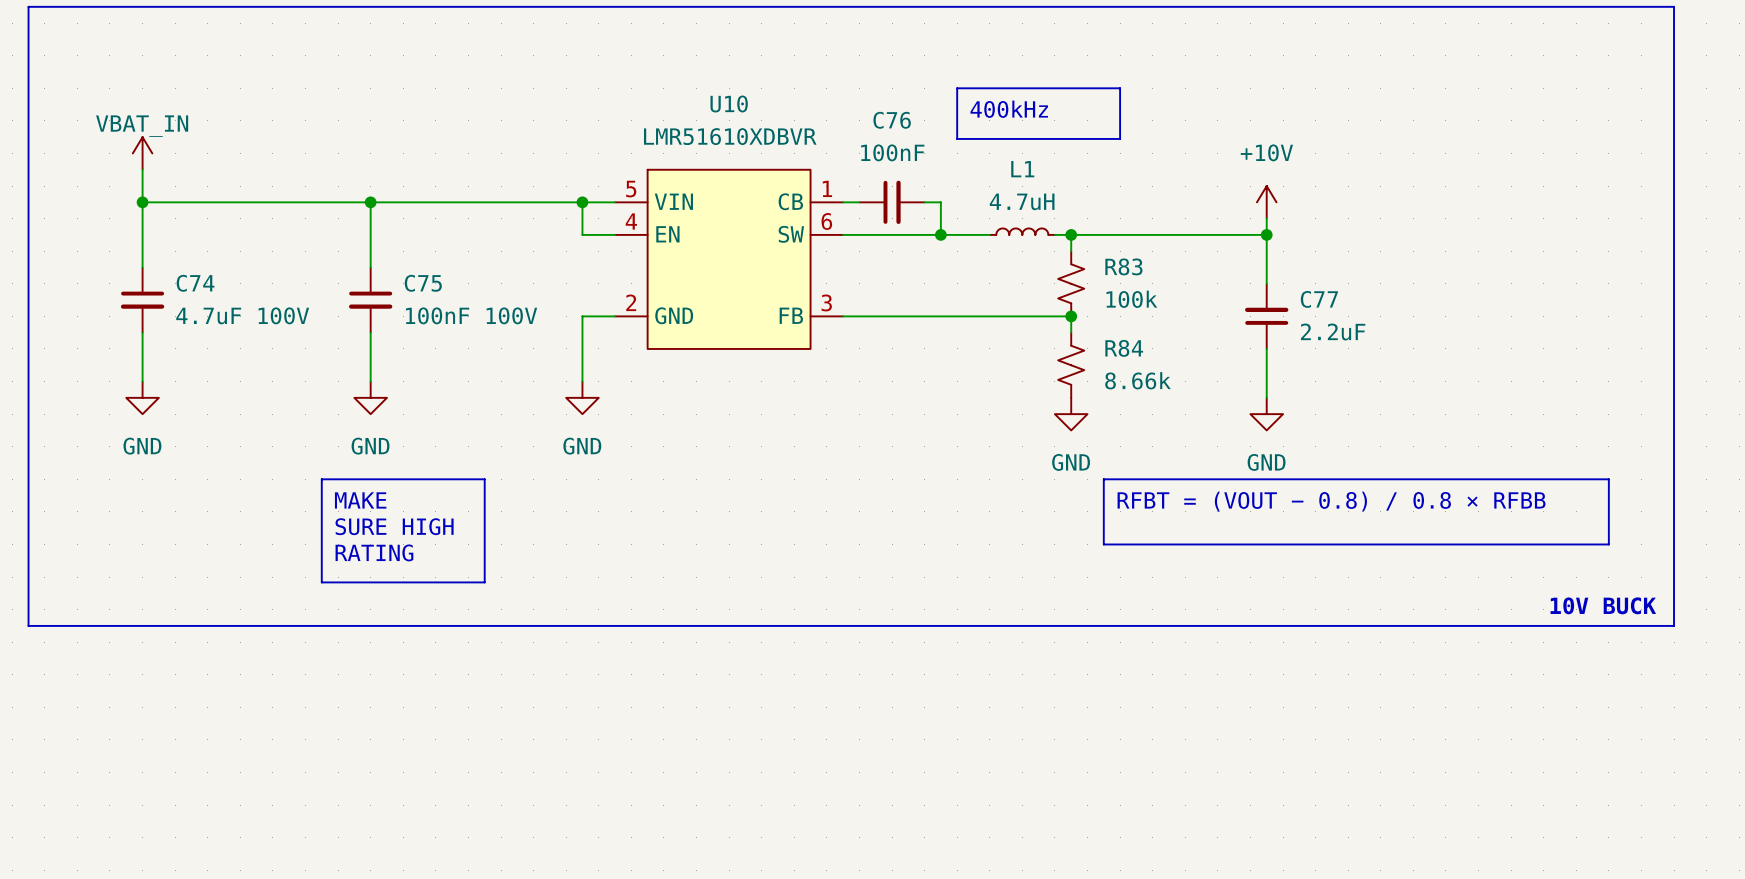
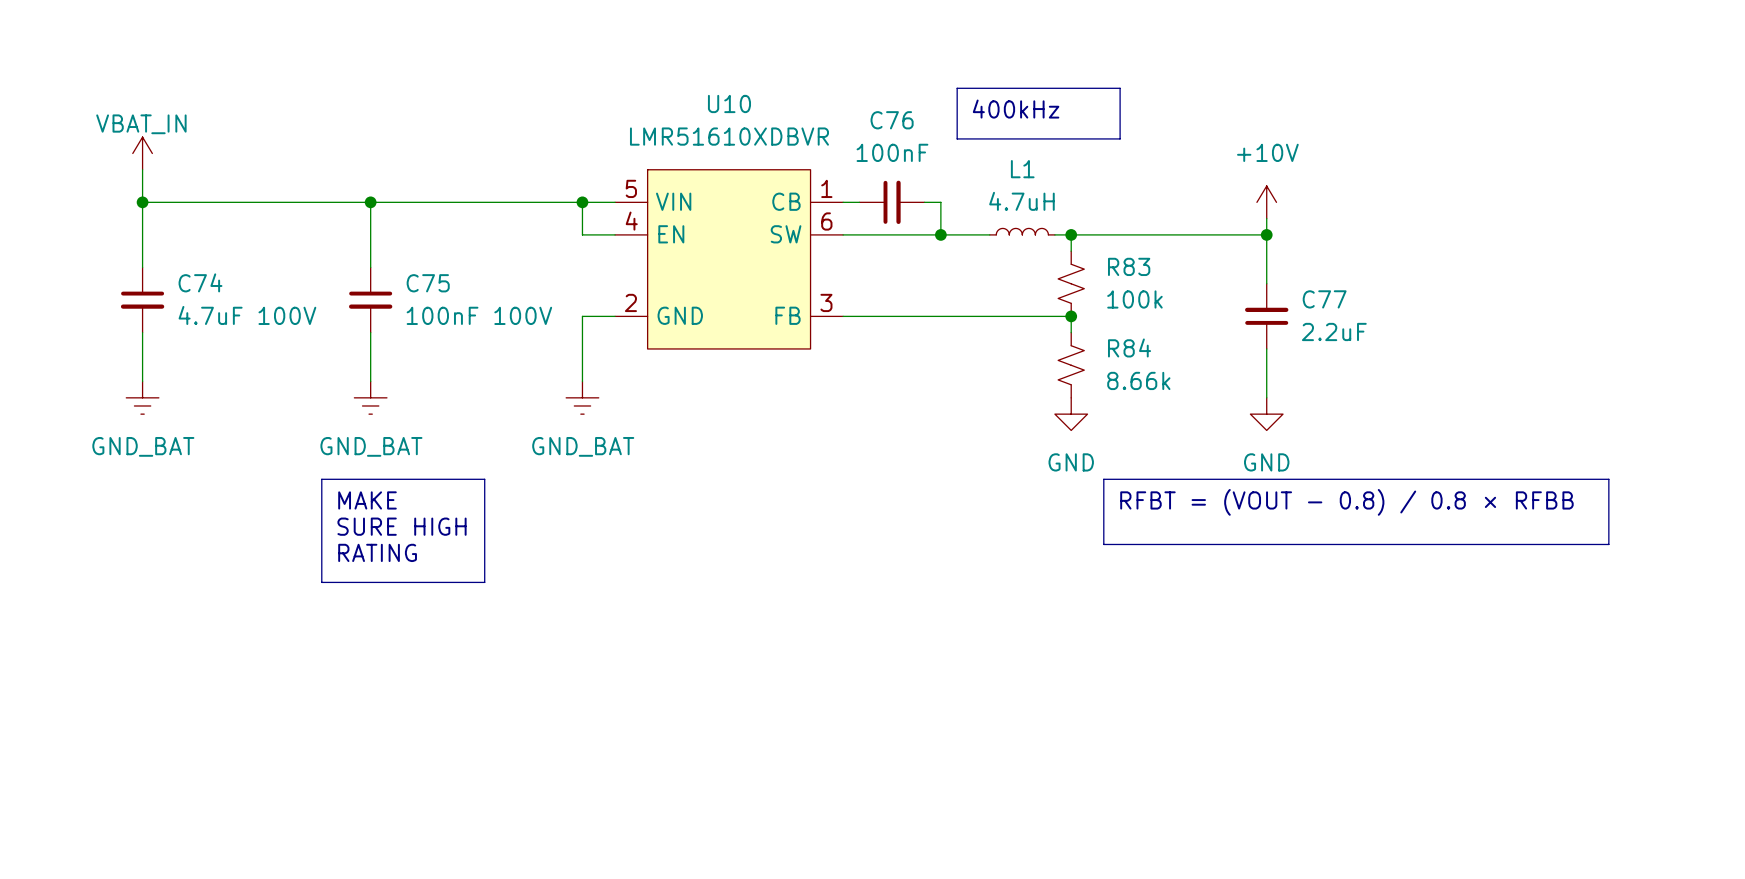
line: (28, 6) (1674, 6) (1674, 625) (28, 625) (28, 6) -> none
power symbol: GND (142, 397) -> GND_BAT (142, 397)
power symbol: GND (370, 397) -> GND_BAT (370, 397)
power symbol: GND (582, 397) -> GND_BAT (582, 397)
text: 10V BUCK (1603, 605) -> none

